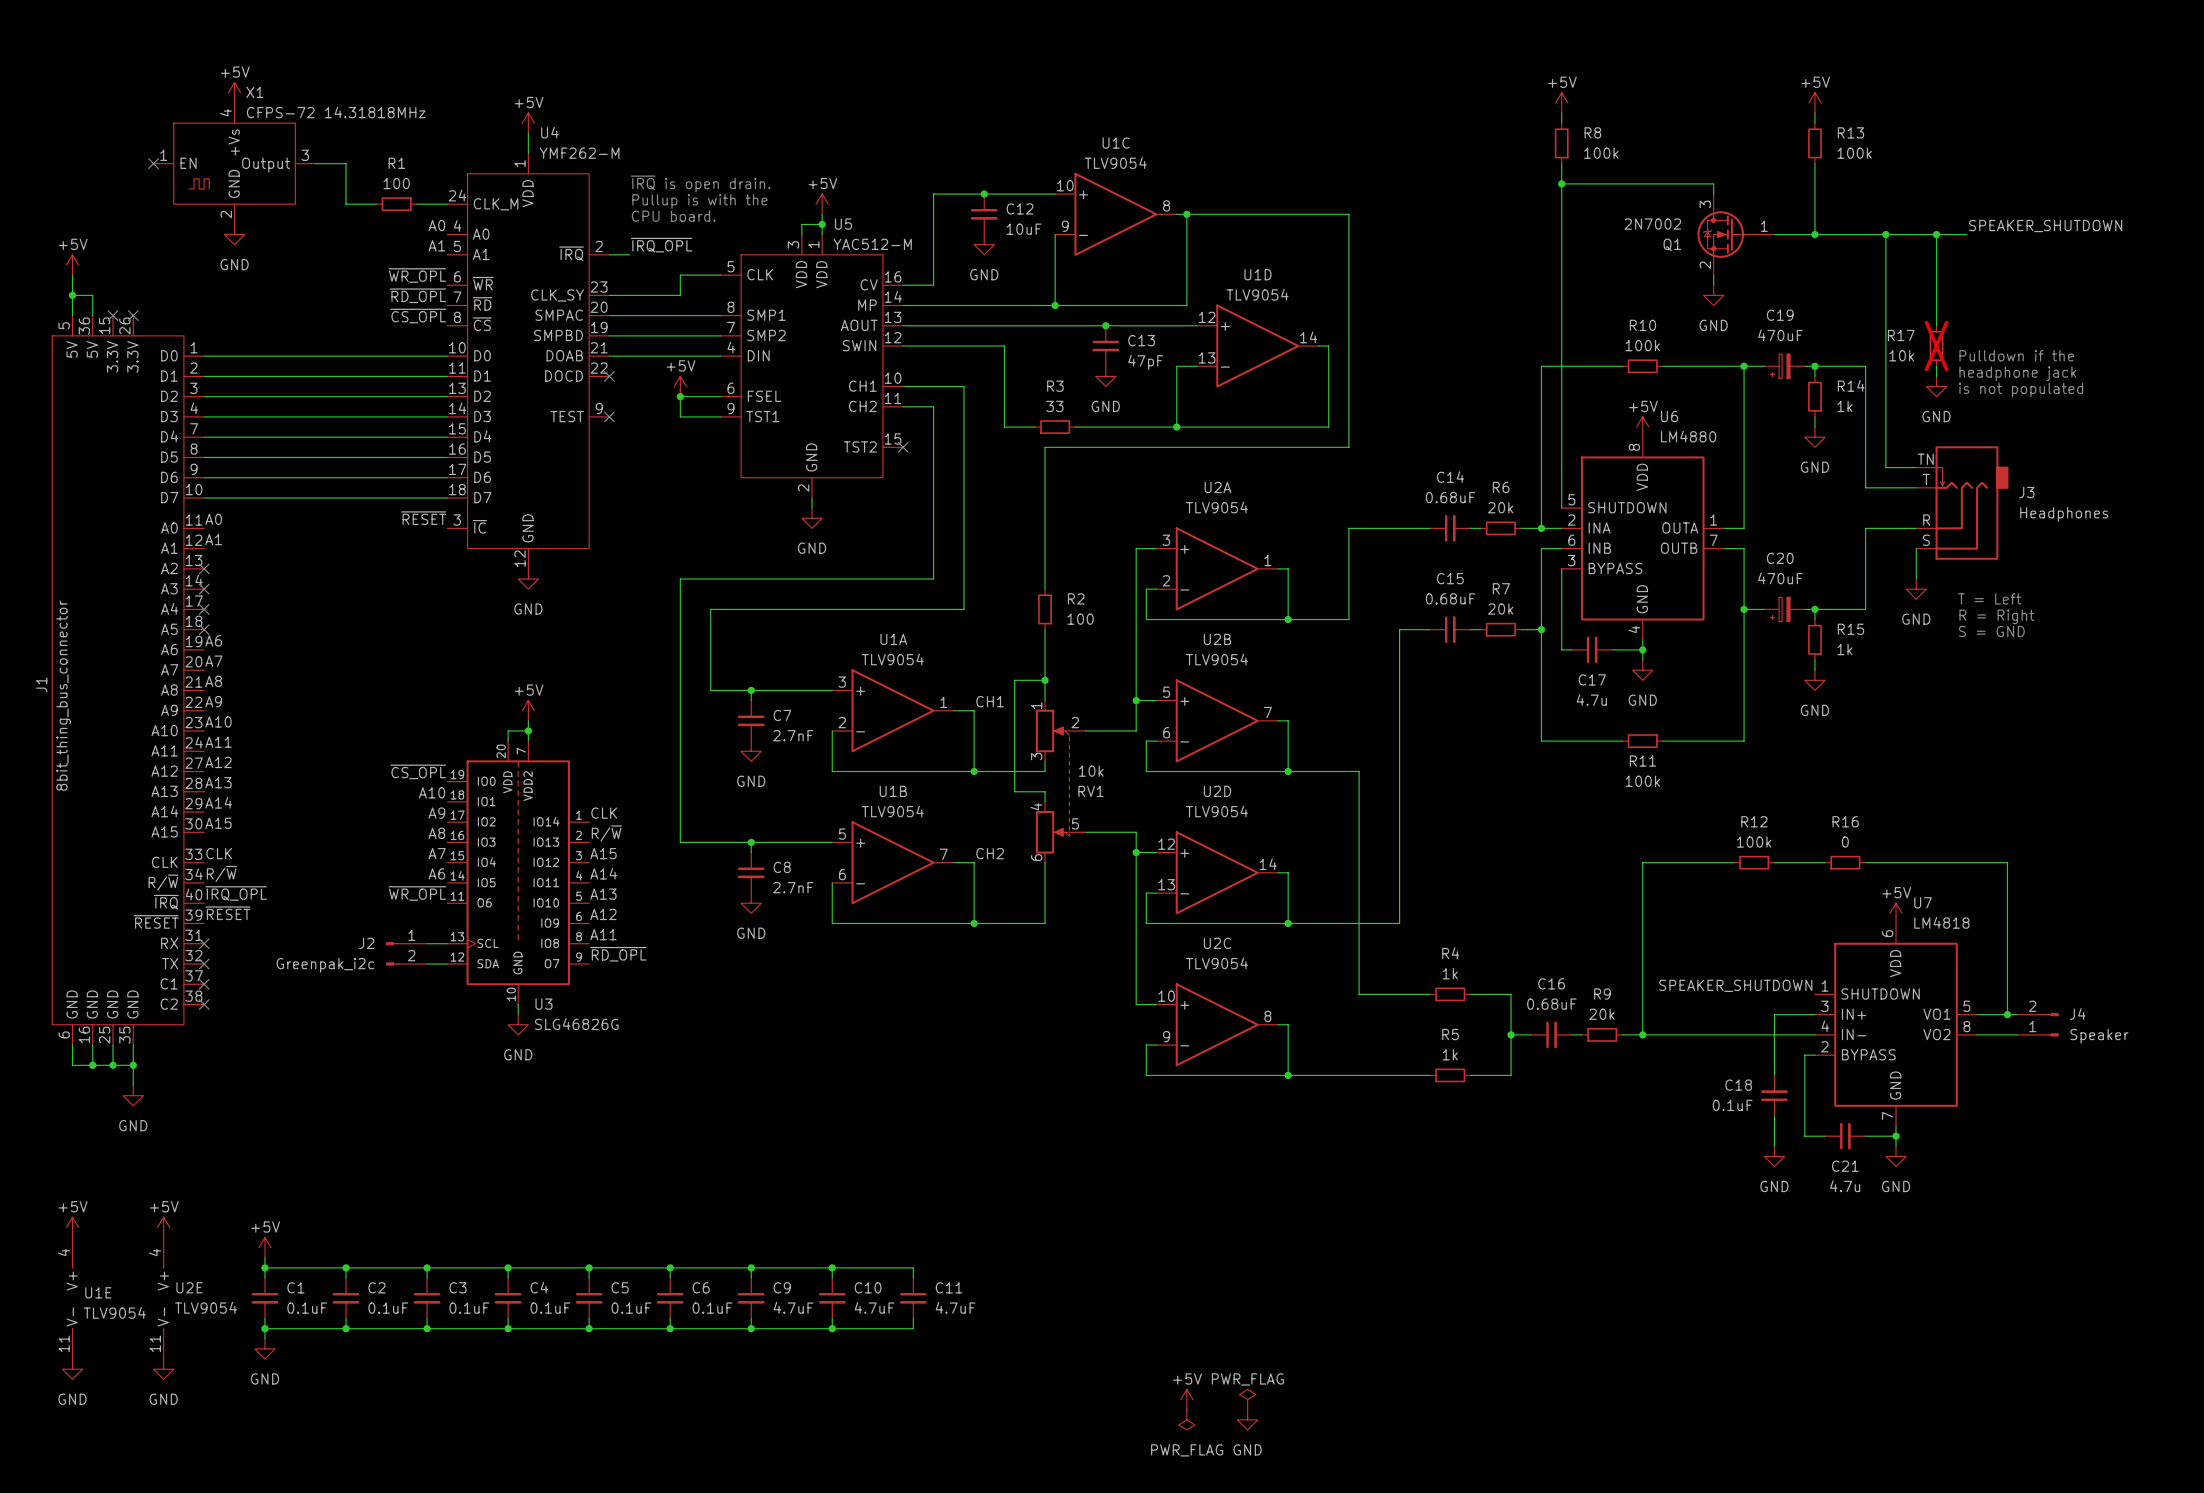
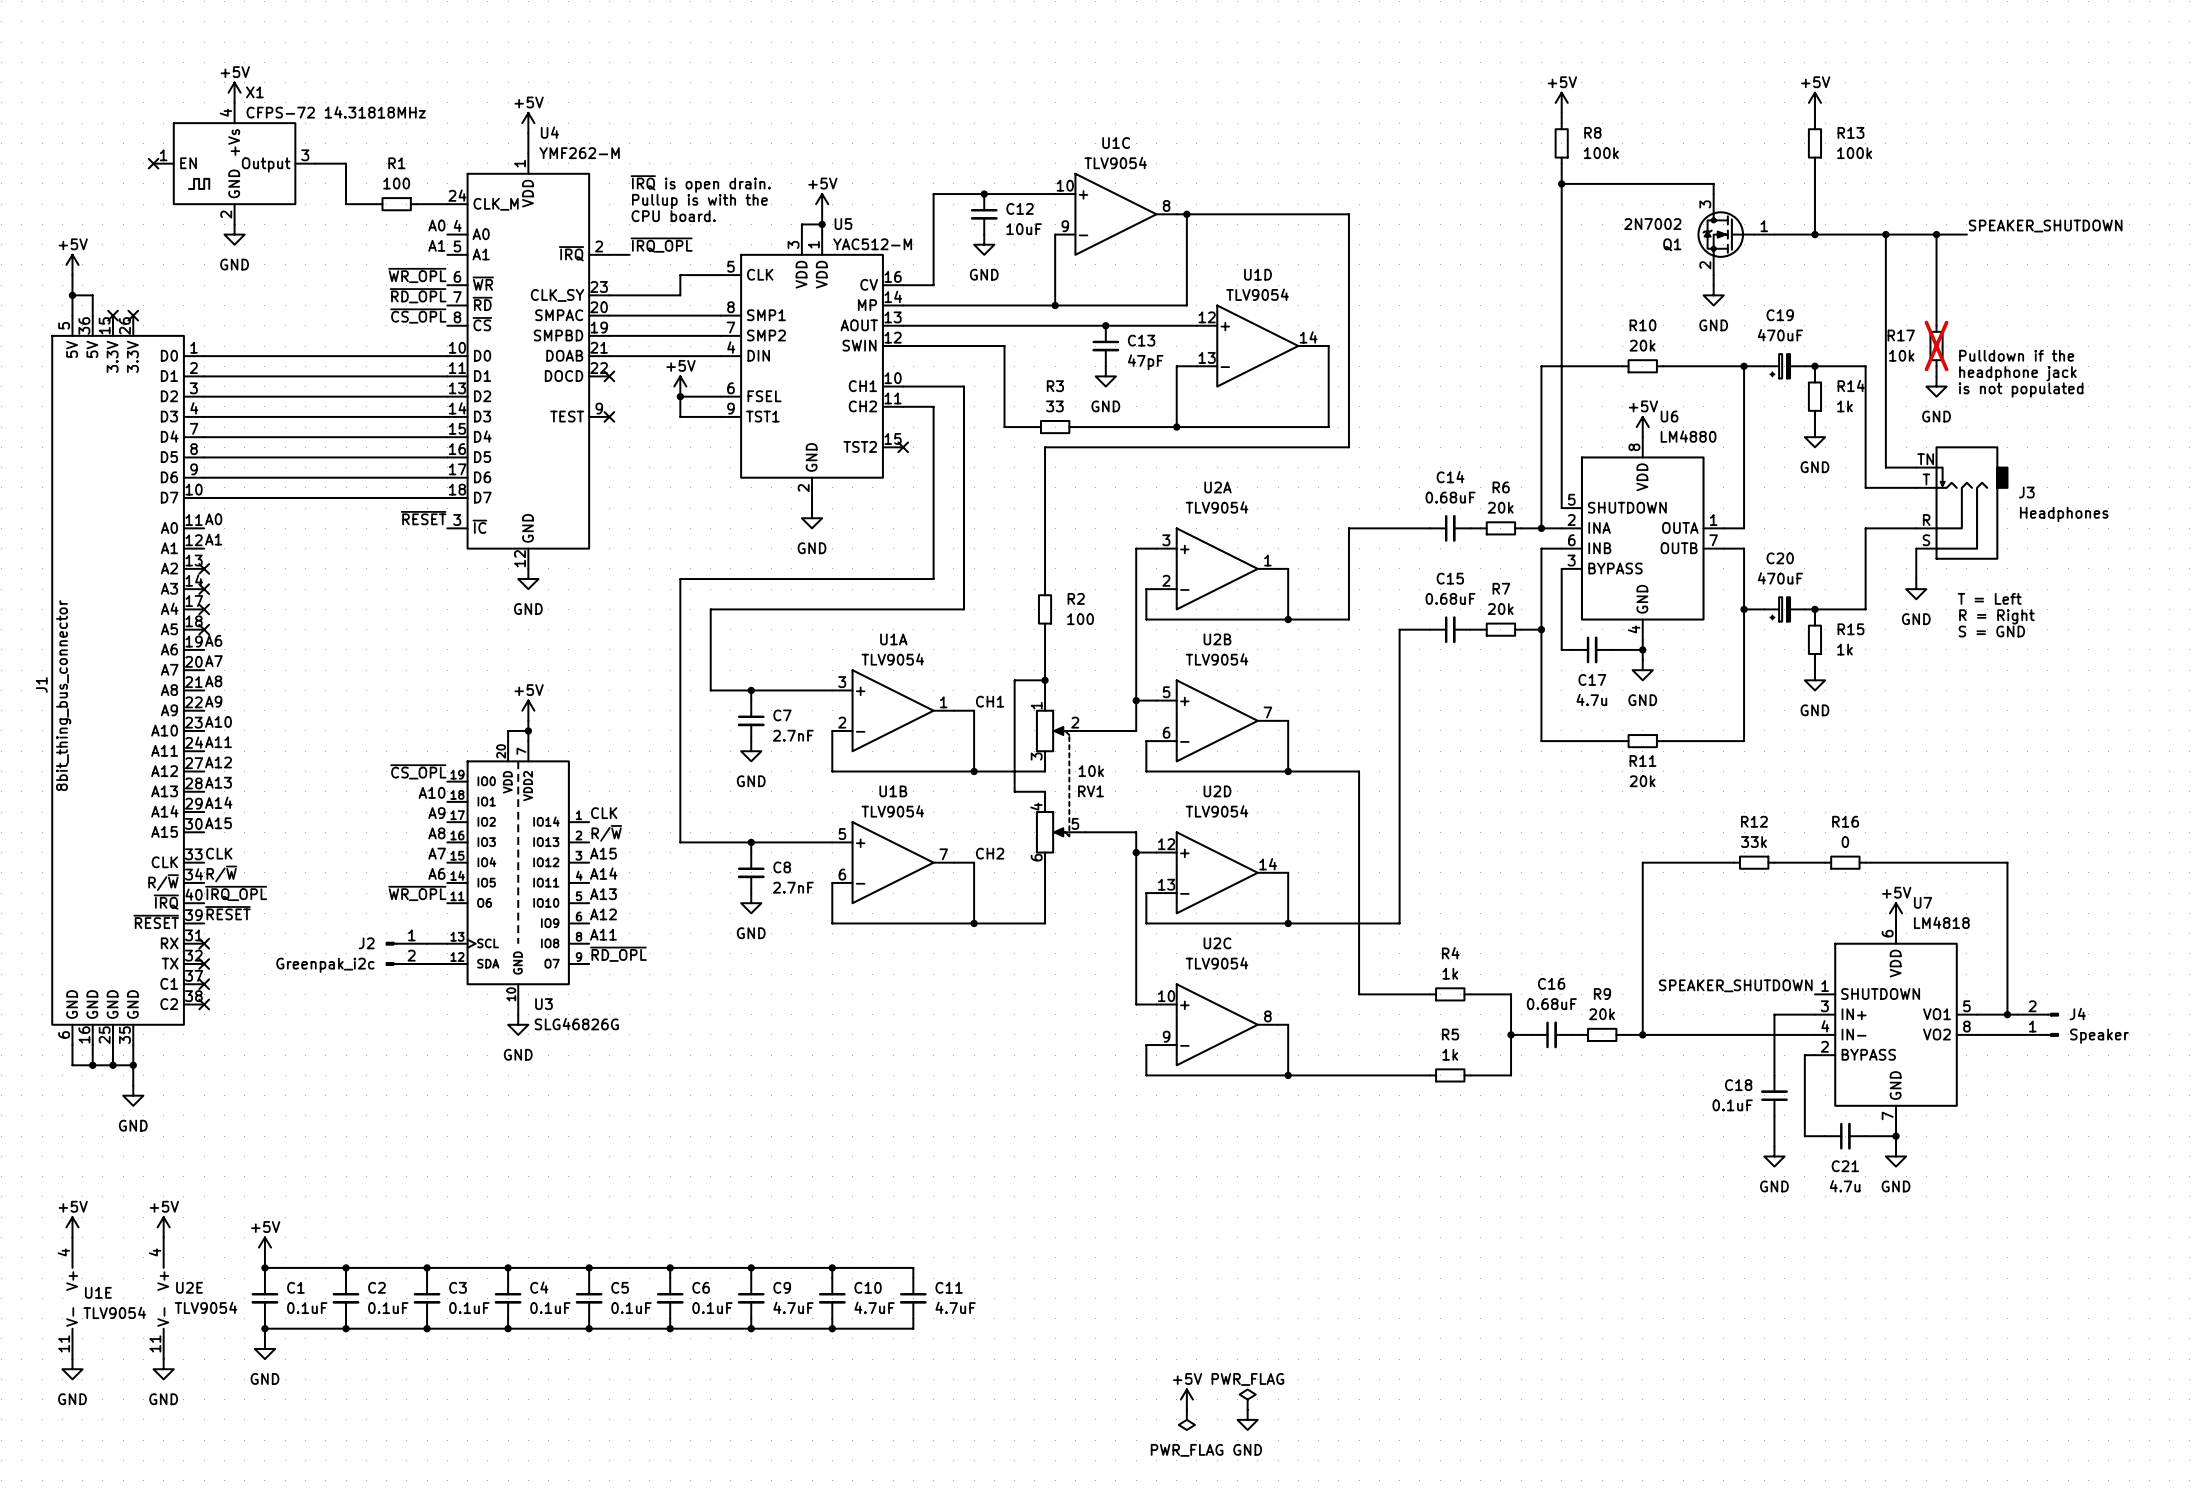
R10 value: 100k (1642, 345) -> 20k (1642, 345)
R11 value: 100k (1642, 781) -> 20k (1642, 781)
R12 value: 100k (1754, 842) -> 33k (1753, 842)

